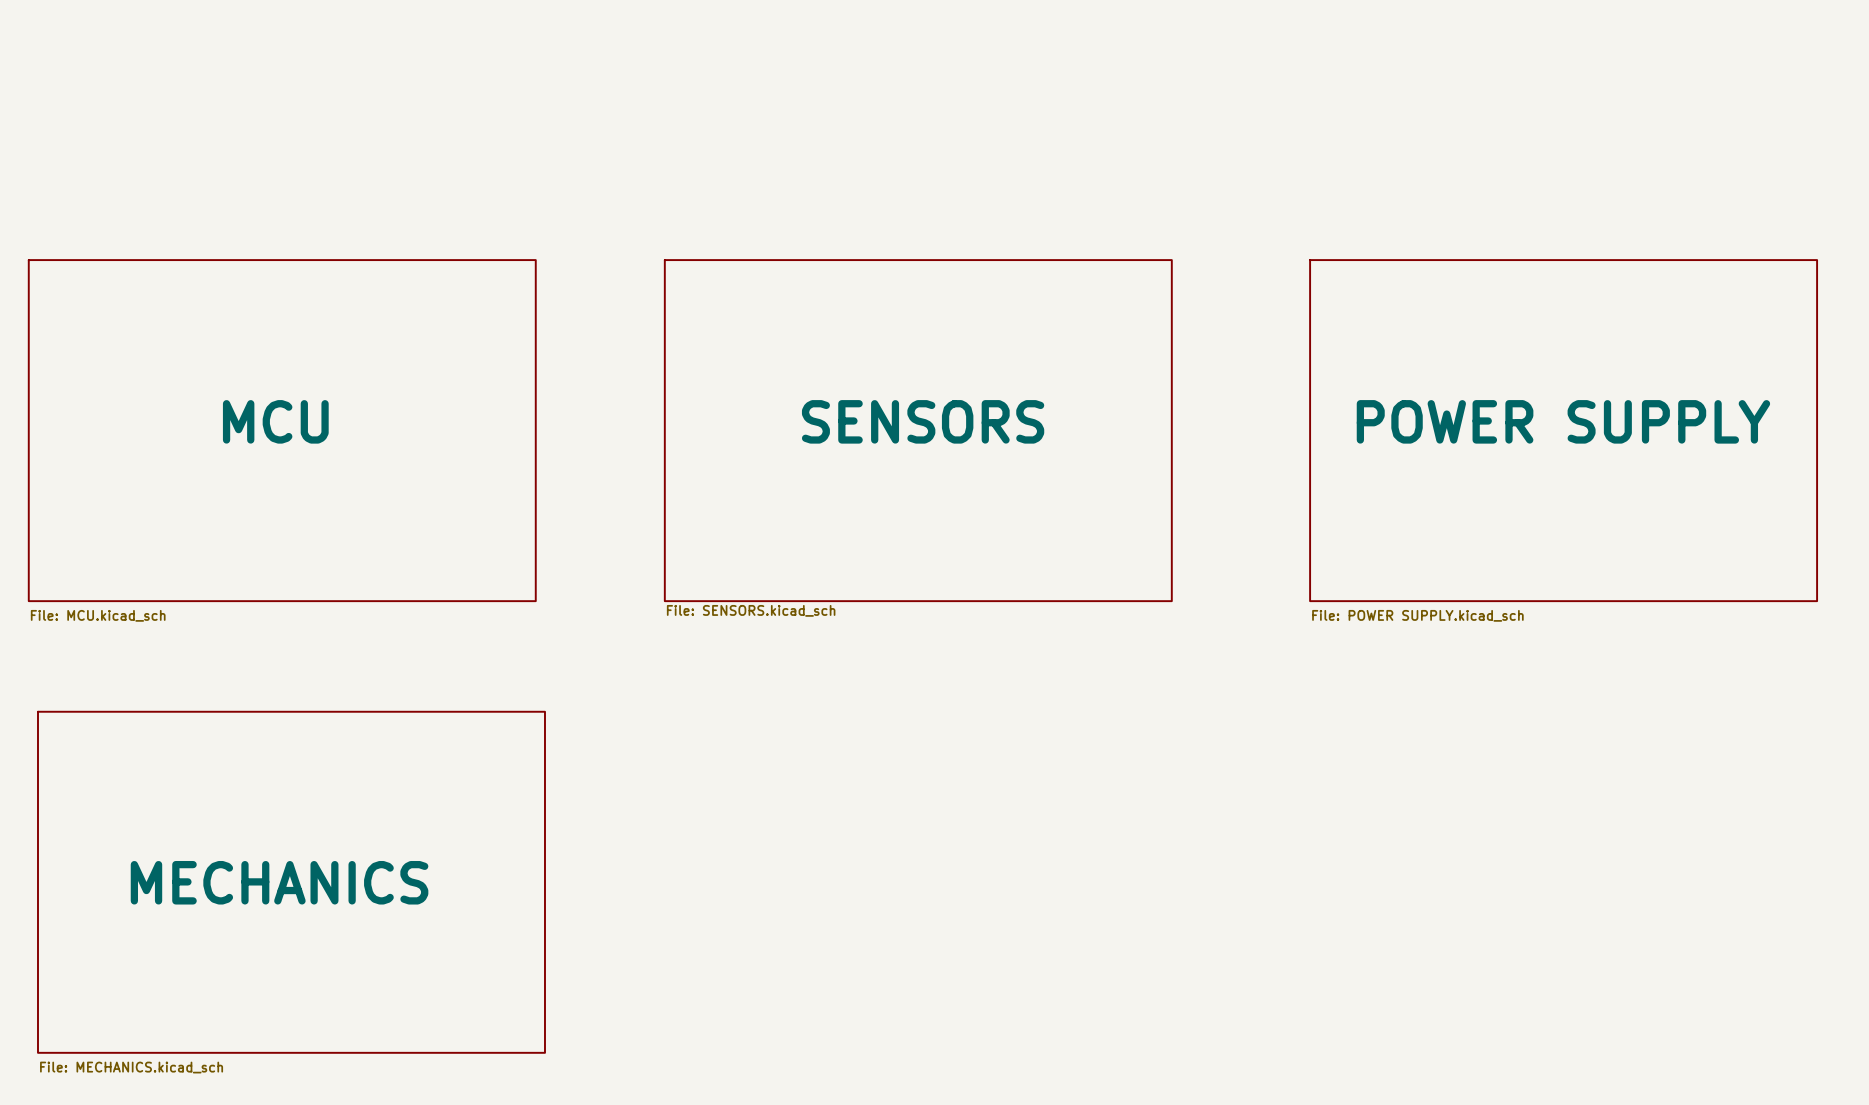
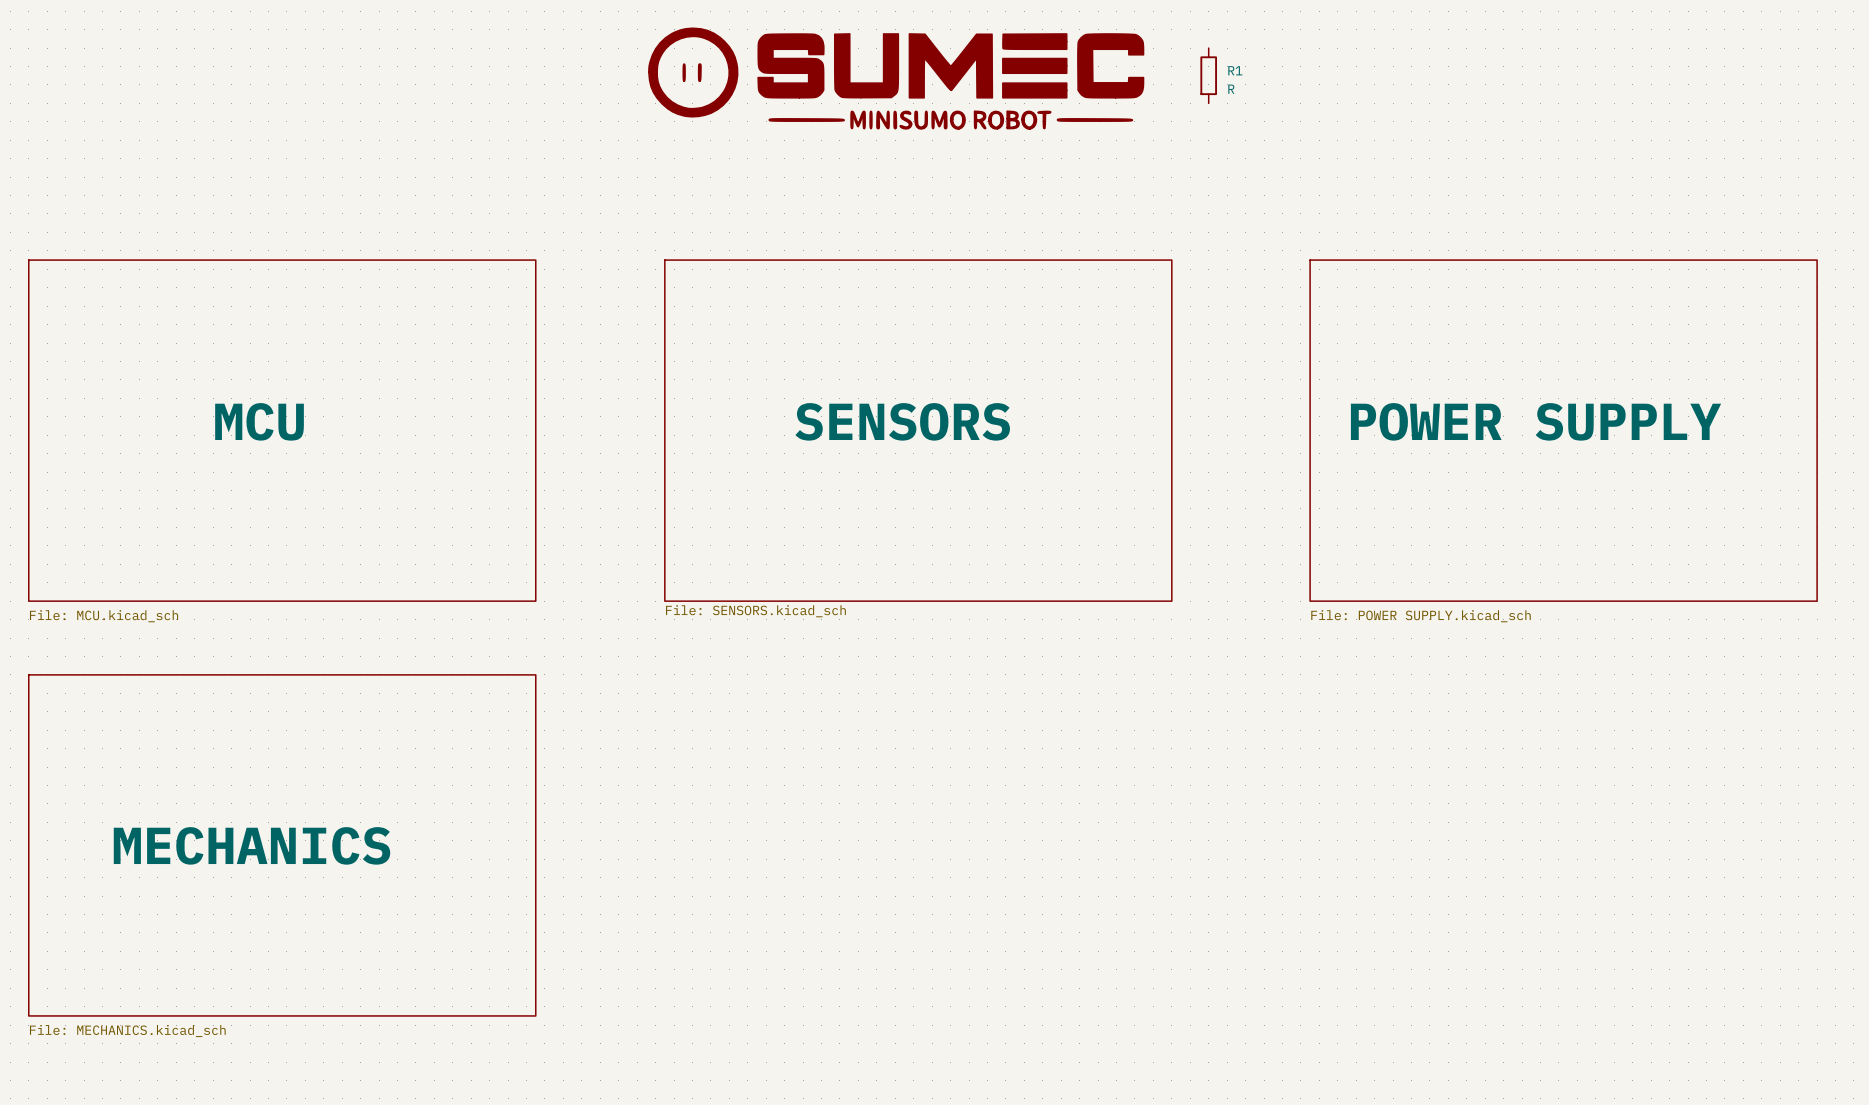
R1: none -> R (1208, 75)
power symbol: none -> (896, 78)
sheet MECHANICS position: (291, 882) -> (282, 845)

